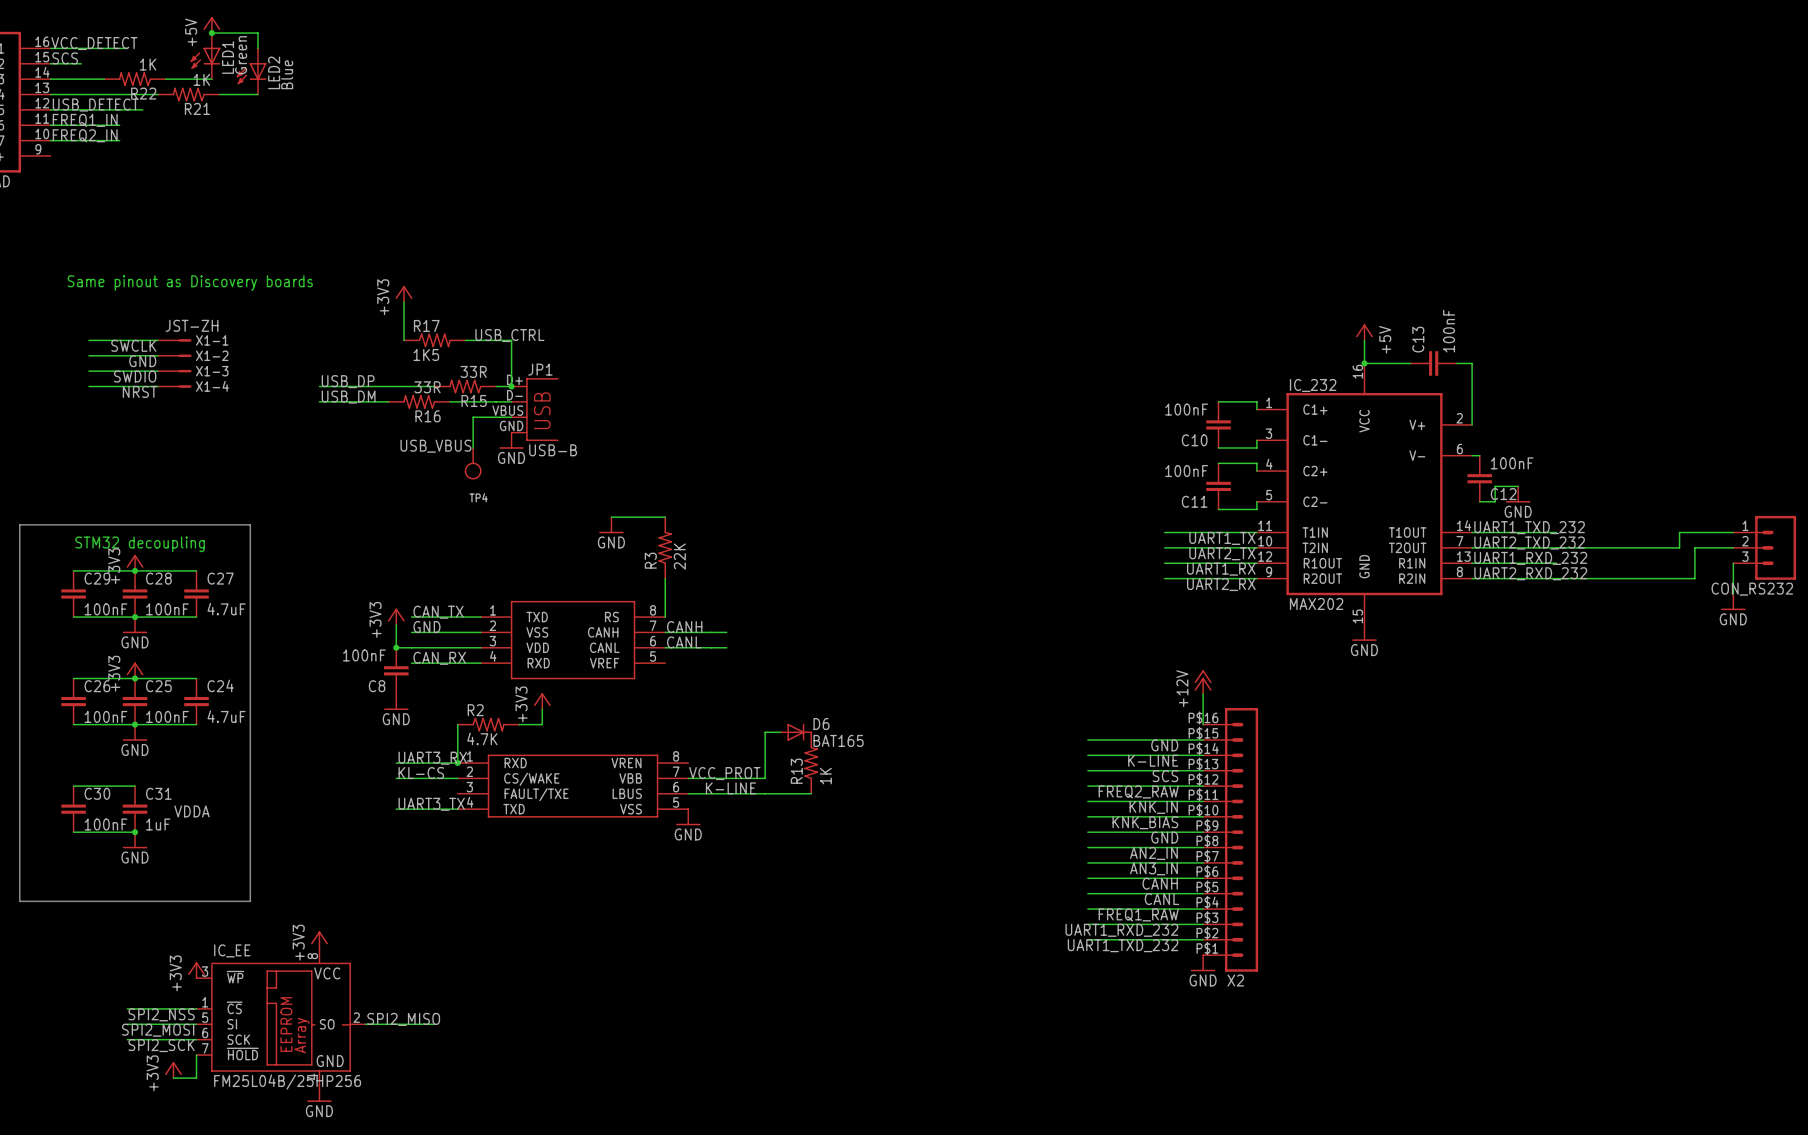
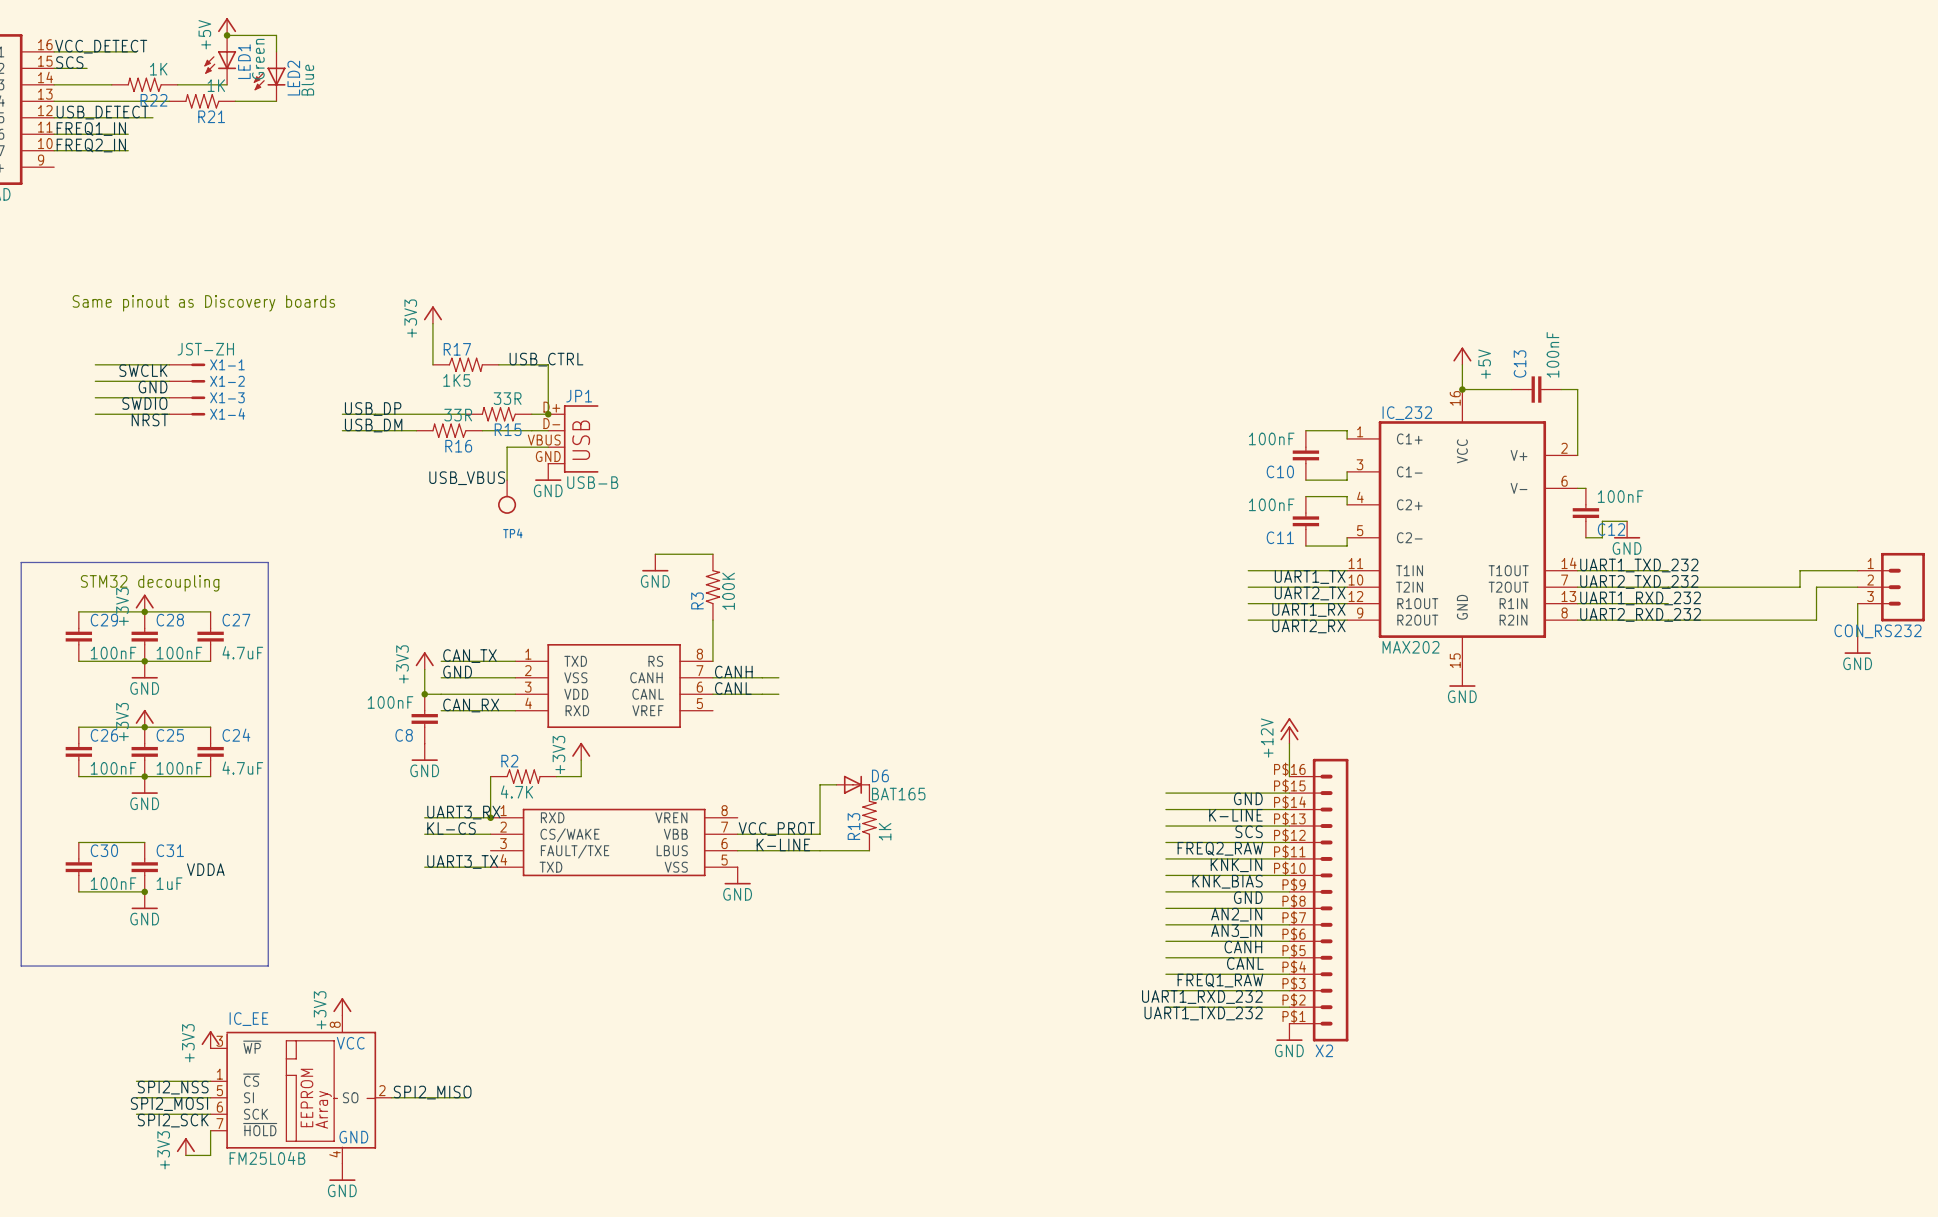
R3 value: 22K (679, 556) -> 100K (728, 591)
IC_EE value: FM25L04B/25HP256 (287, 1082) -> FM25L04B (267, 1158)

